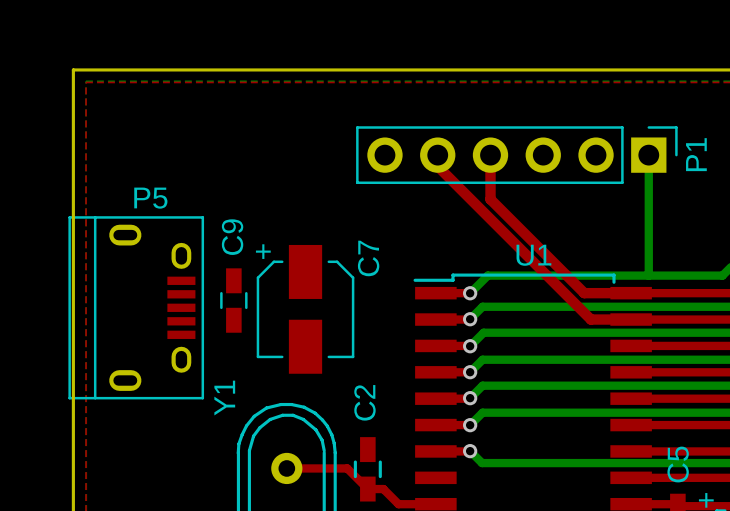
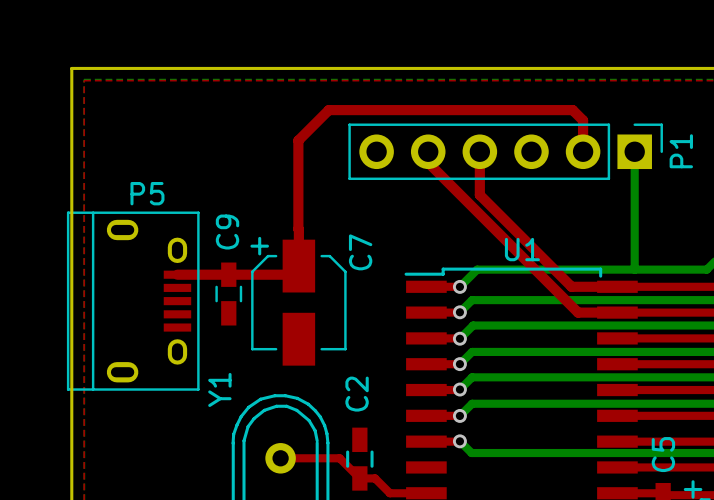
top track: none -> (583, 151) (583, 120) (572, 110) (328, 110) (298, 140) (298, 266) (290, 274) (177, 274)

